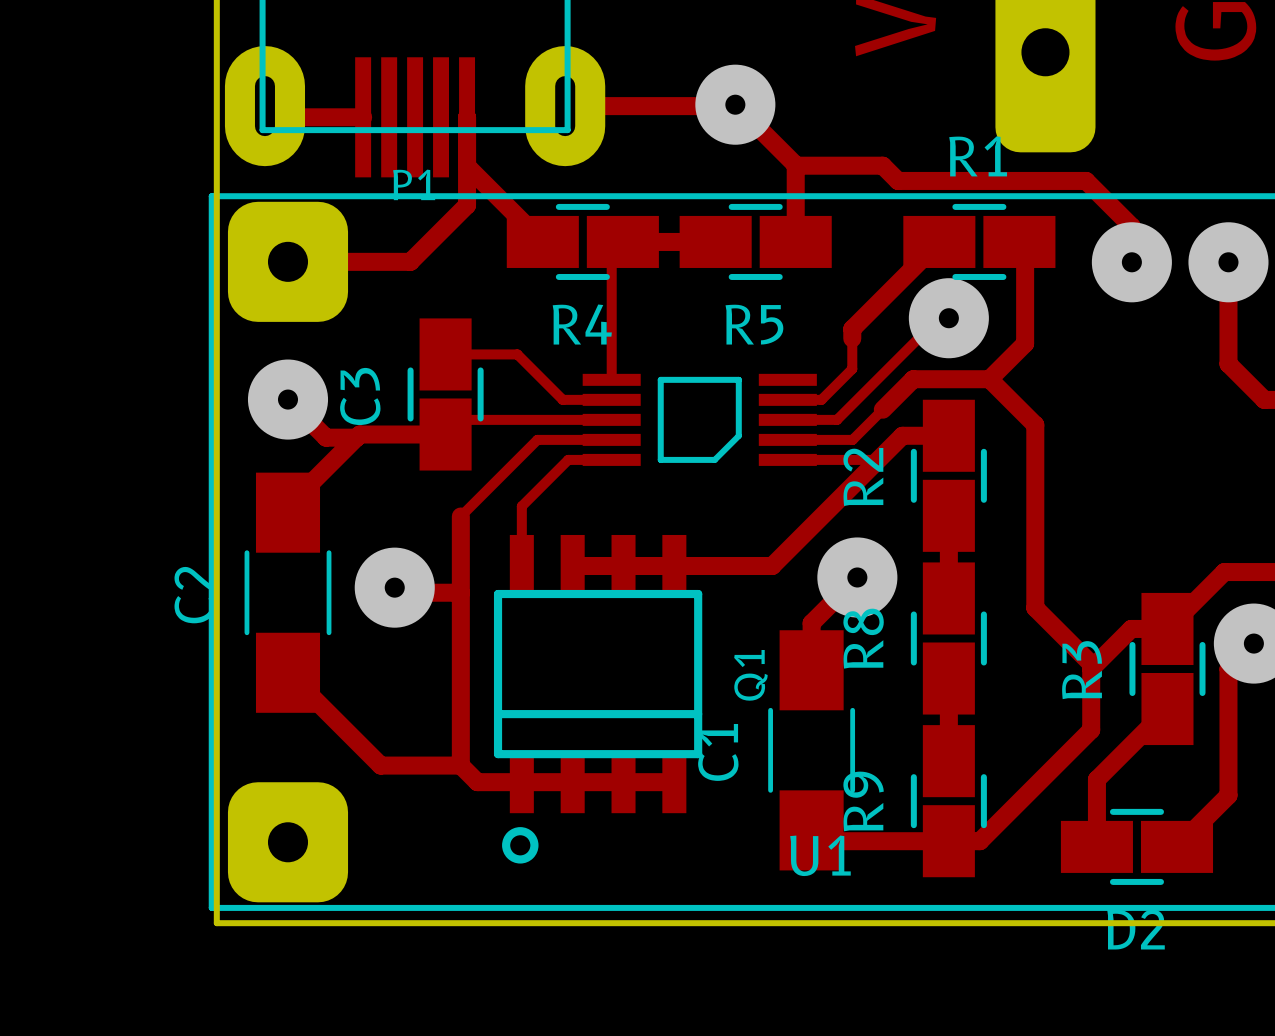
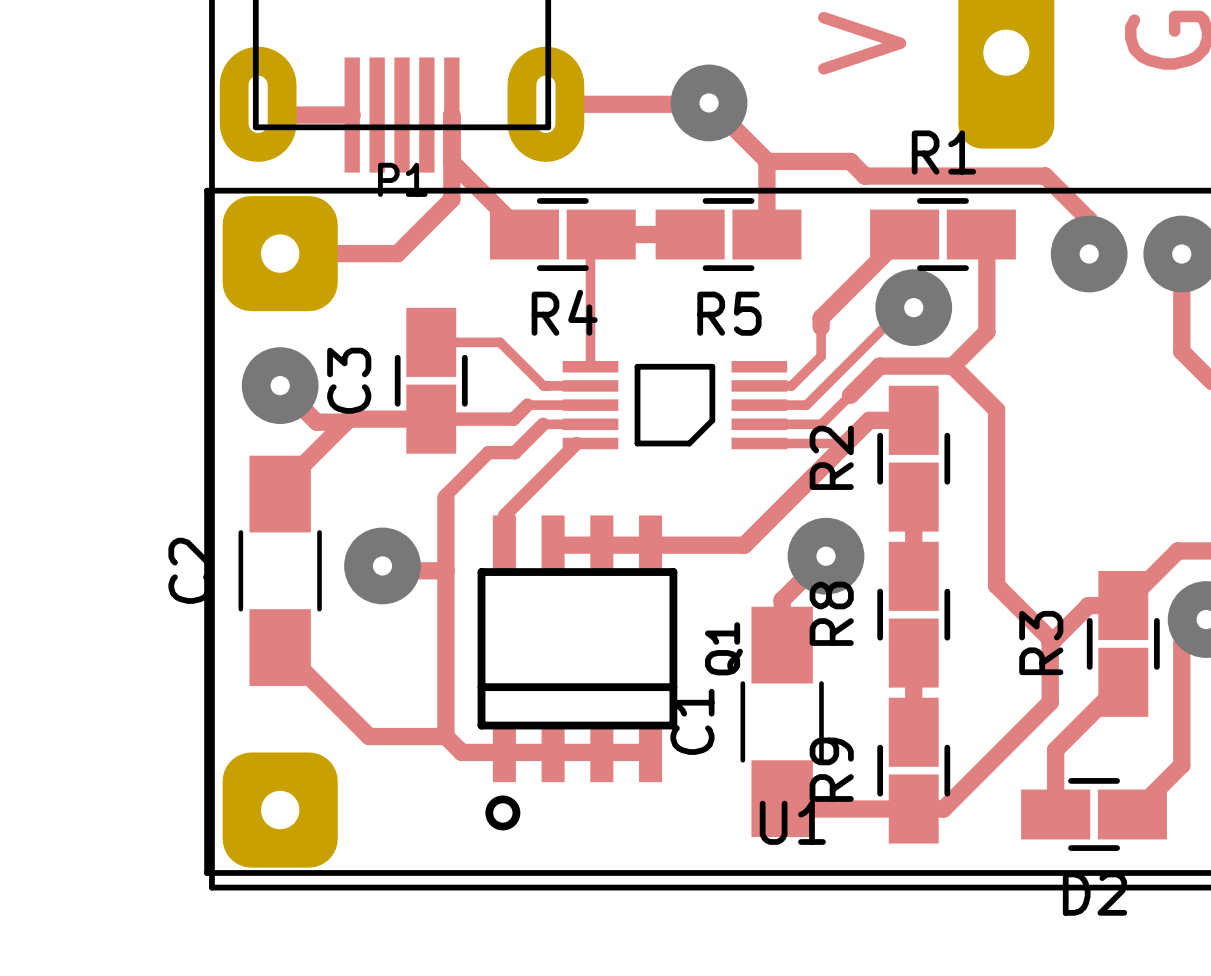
track: (460, 419) (545, 419) -> (431, 419) (513, 419) (527, 405)
track: (562, 439) (537, 439) (460, 516) -> (543, 424) (514, 452) (488, 452) (445, 495) (445, 497)
track: (597, 459) (568, 459) (521, 506) (521, 535) -> (576, 443) (504, 515)

